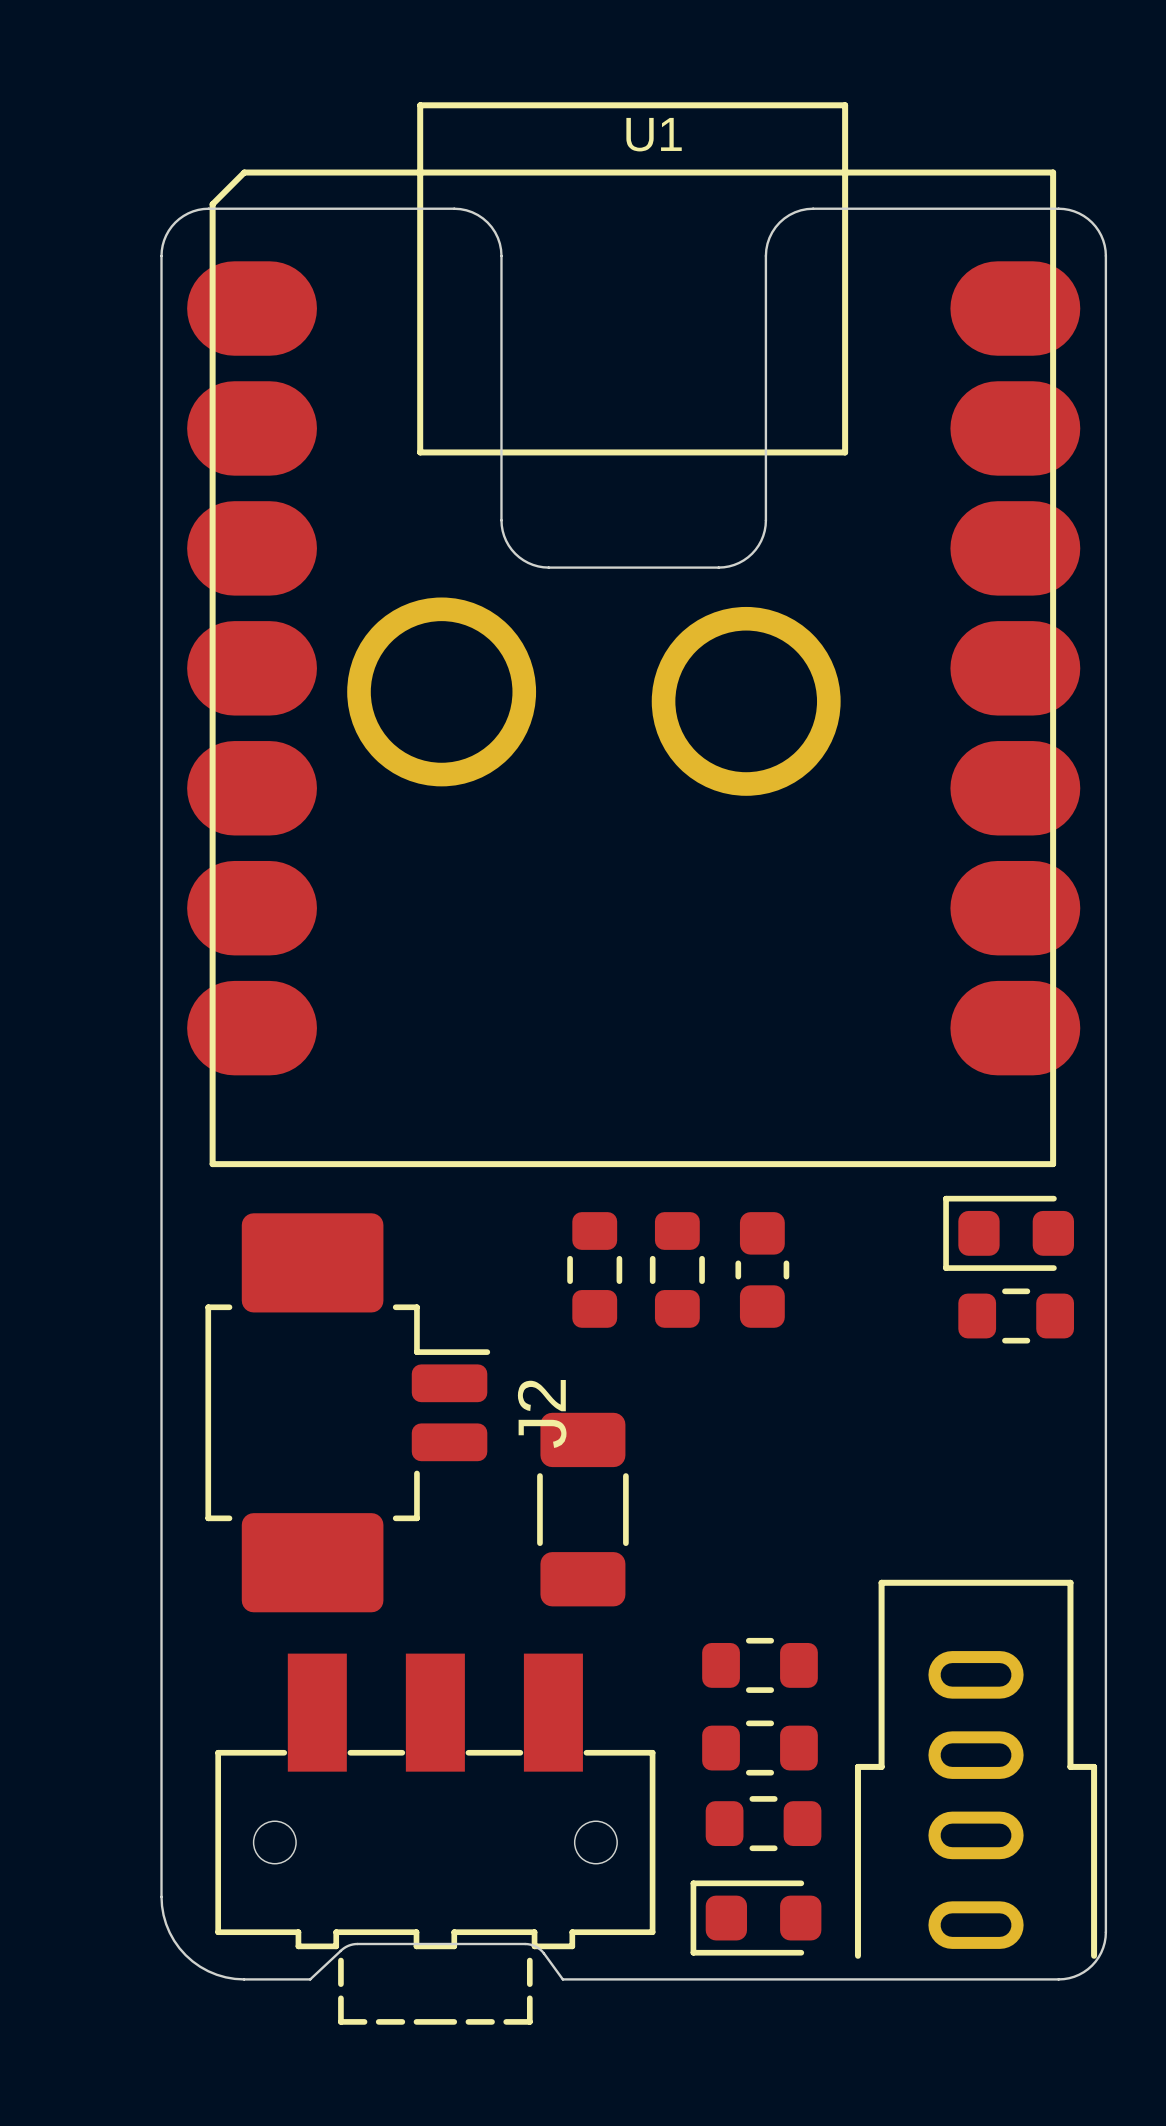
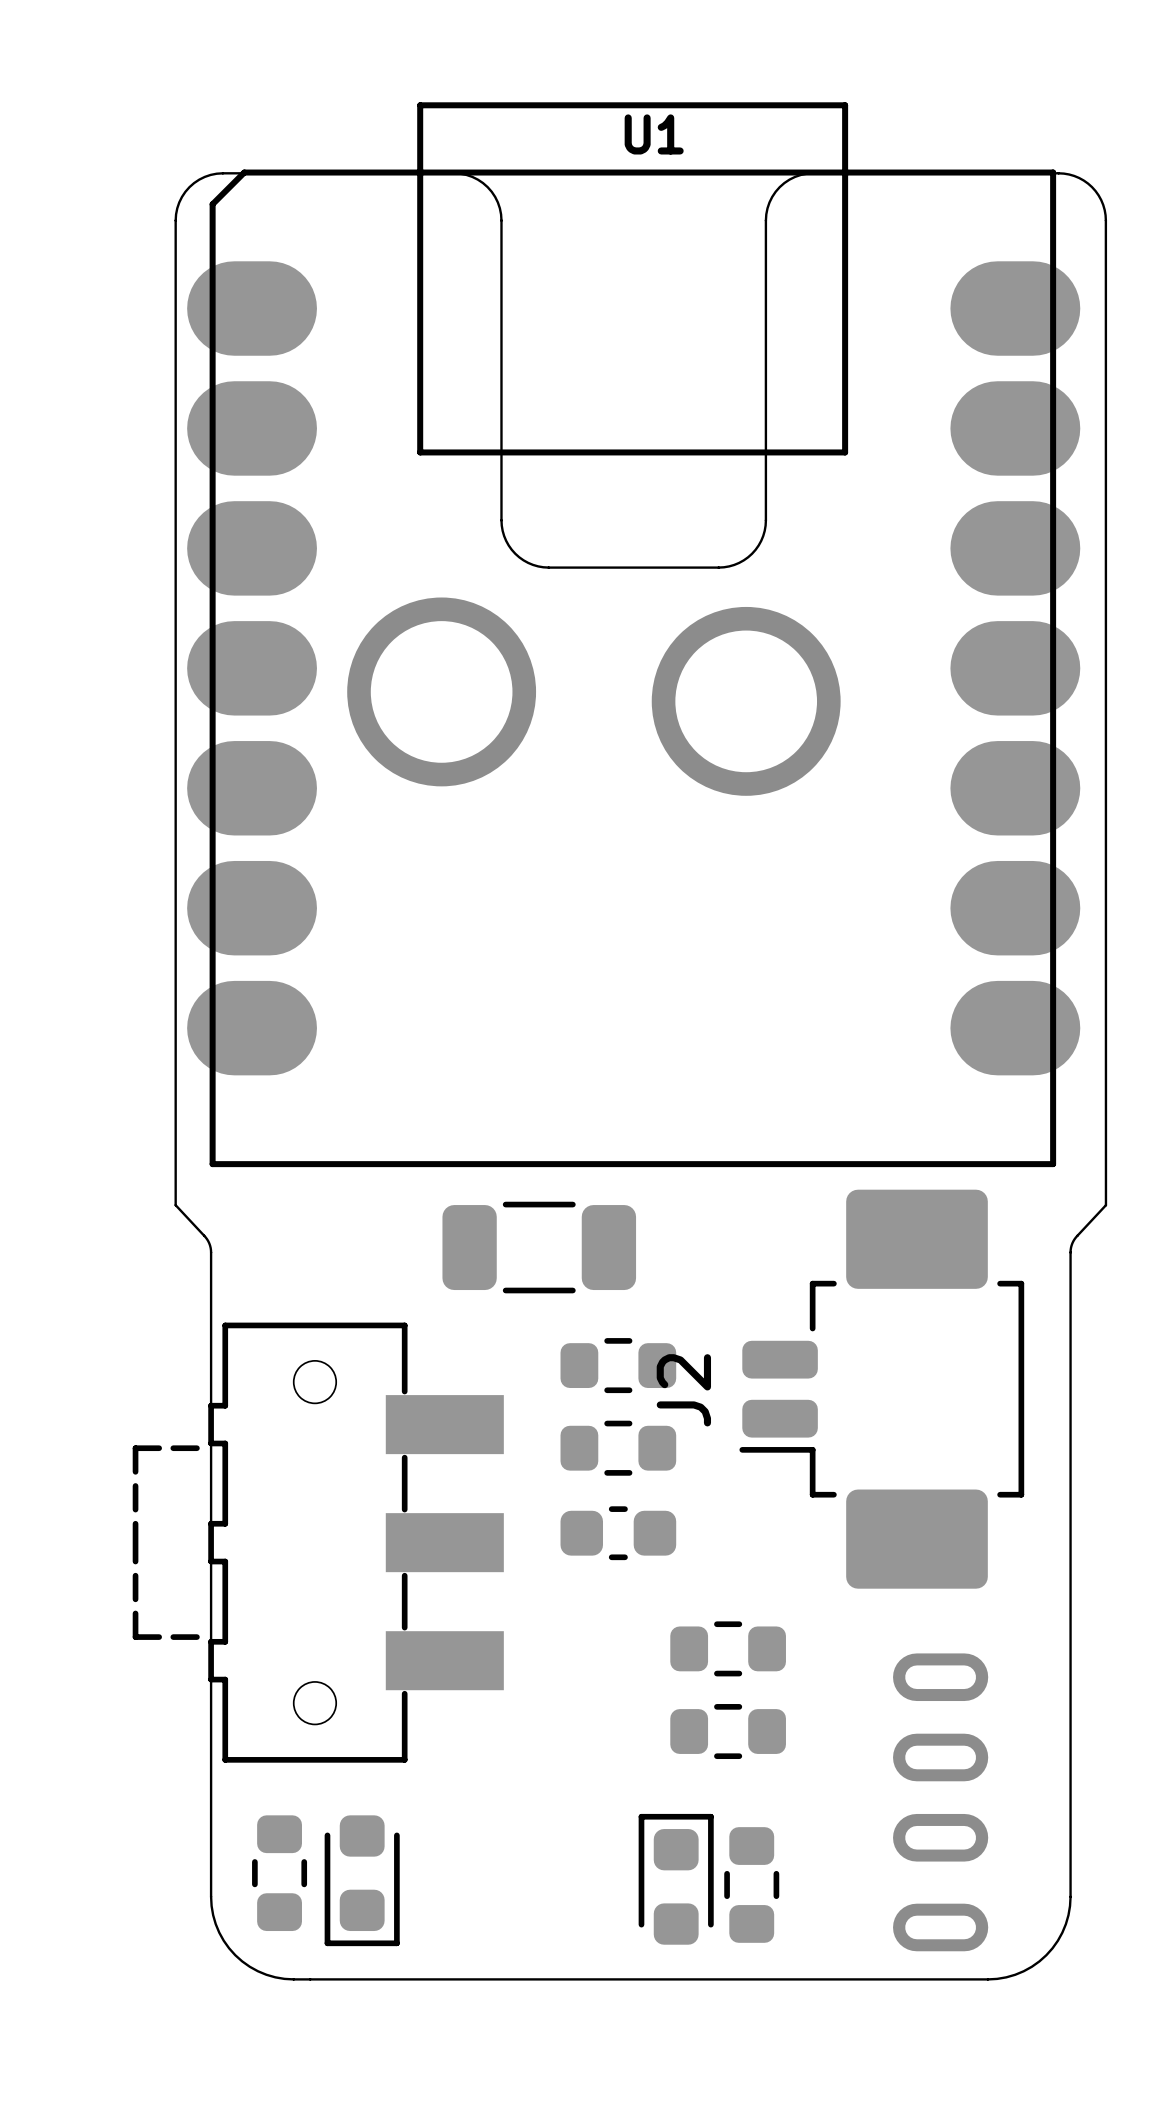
board edge: (501, 255) (497, 237) (487, 222) (472, 212) (454, 208) (203, 209) (188, 213) (179, 219) (168, 230) (162, 245) (161, 1896) (166, 1924) (179, 1948) (200, 1966) (225, 1977) (244, 1979) (310, 1979) (342, 1949) (355, 1944) (525, 1944) (533, 1945) (542, 1951) (562, 1979) -> (501, 255) (501, 214) (495, 196) (487, 187) (477, 179) (460, 173) (216, 173) (204, 176) (194, 183) (185, 191) (179, 202) (175, 220) (175, 1205) (205, 1237) (210, 1250) (211, 1896) (213, 1915) (219, 1932) (229, 1948) (249, 1966) (266, 1974) (284, 1978) (562, 1979)
board edge: (765, 255) (769, 237) (779, 222) (795, 212) (813, 208) (1063, 209) (1079, 213) (1092, 222) (1101, 235) (1105, 250) (1105, 1937) (1101, 1952) (1095, 1961) (1088, 1969) (1074, 1976) (1058, 1979) (987, 1979) -> (765, 255) (766, 214) (772, 196) (784, 183) (795, 176) (806, 173) (1063, 173) (1079, 177) (1092, 187) (1101, 200) (1105, 215) (1105, 1205) (1075, 1237) (1070, 1250) (1070, 1906) (1062, 1932) (1046, 1955) (1023, 1971) (1006, 1977) (987, 1979)
part: (1008, 1233) -> none
part: (594, 1269) -> none
part: (677, 1269) -> none
part rotation: 0° (762, 1269) -> 90° clockwise (618, 1533)
part position: (762, 1269) -> (618, 1533)
part: (1016, 1316) -> none
part: none -> (618, 1365)
J2 rotation: 0° (347, 1412) -> 180° (881, 1389)
J2 position: (347, 1412) -> (881, 1389)
part: none -> (618, 1448)
part rotation: 0° (582, 1509) -> 90° clockwise (539, 1247)
part position: (582, 1509) -> (539, 1247)
part position: (760, 1665) -> (728, 1648)
part position: (760, 1748) -> (728, 1731)
part side: top (976, 1769) -> bottom (940, 1802)
part rotation: 0° (763, 1823) -> 90° clockwise (751, 1884)
part rotation: 0° (435, 1839) -> 90° clockwise (318, 1542)
part position: (435, 1839) -> (318, 1542)
part: none -> (279, 1873)
part: none -> (362, 1880)
part rotation: 0° (755, 1918) -> 90° clockwise (676, 1879)
part position: (755, 1918) -> (676, 1879)

